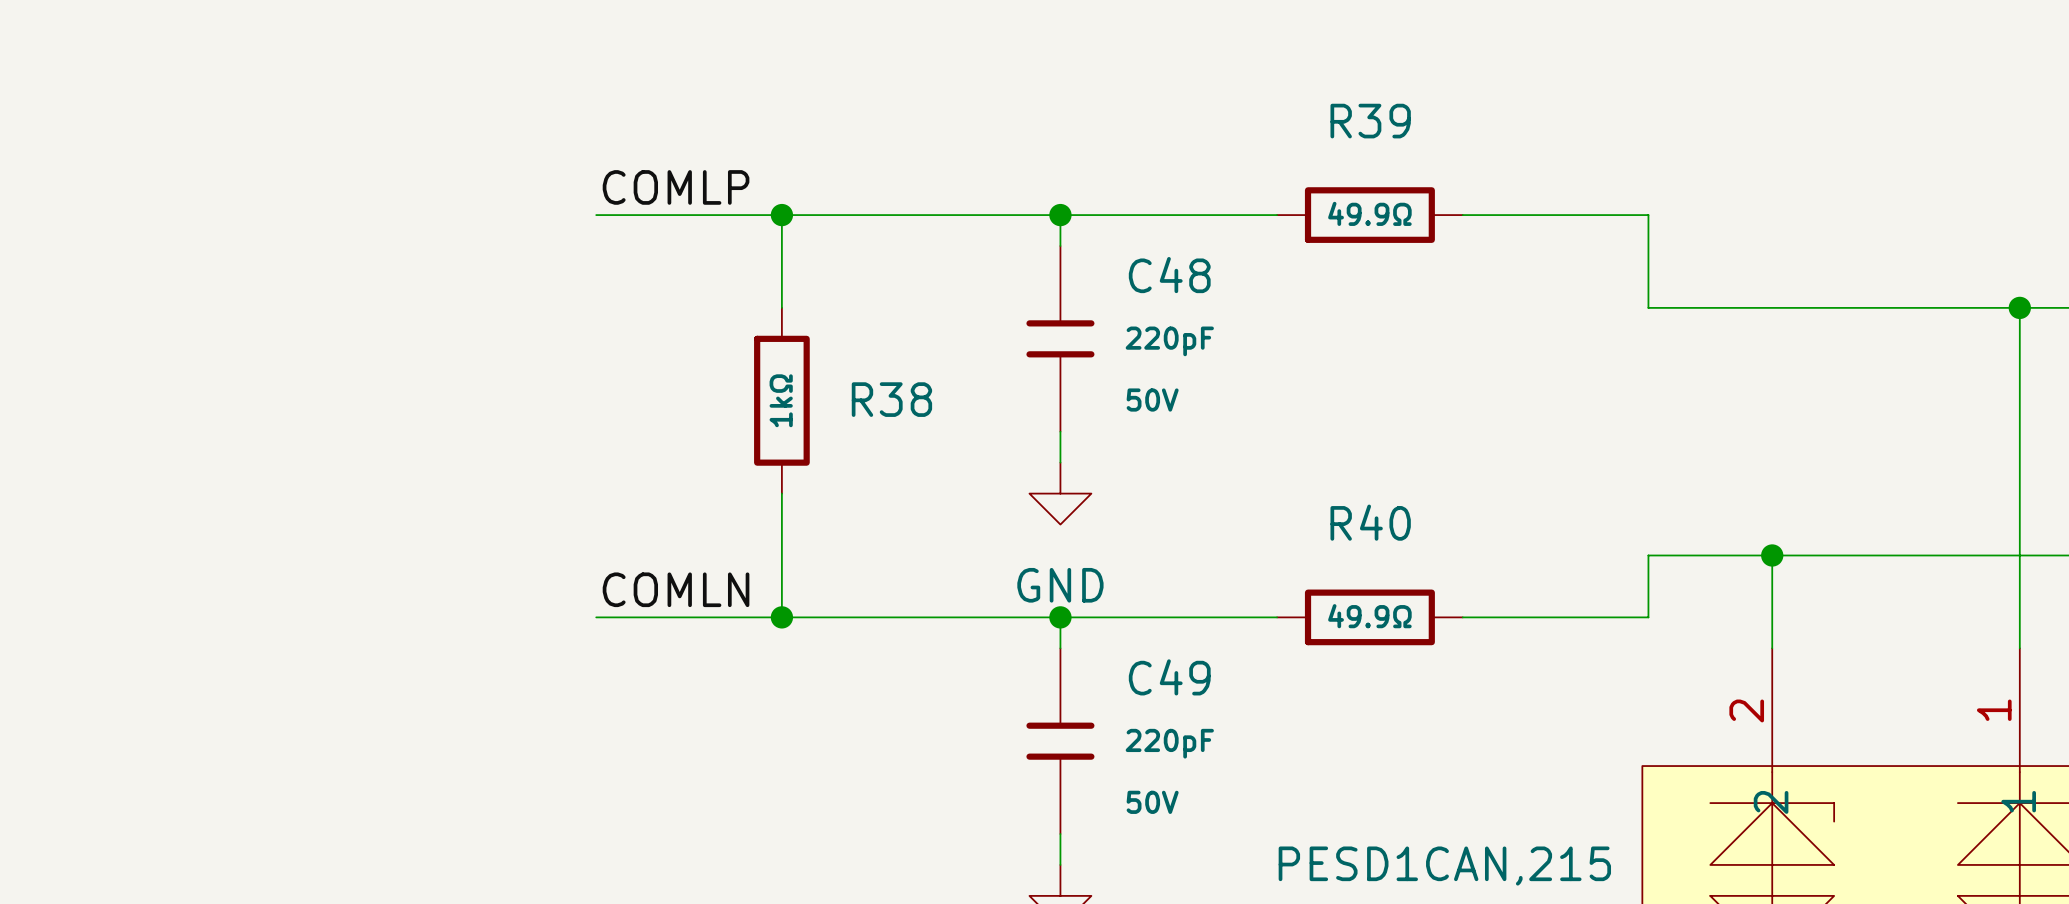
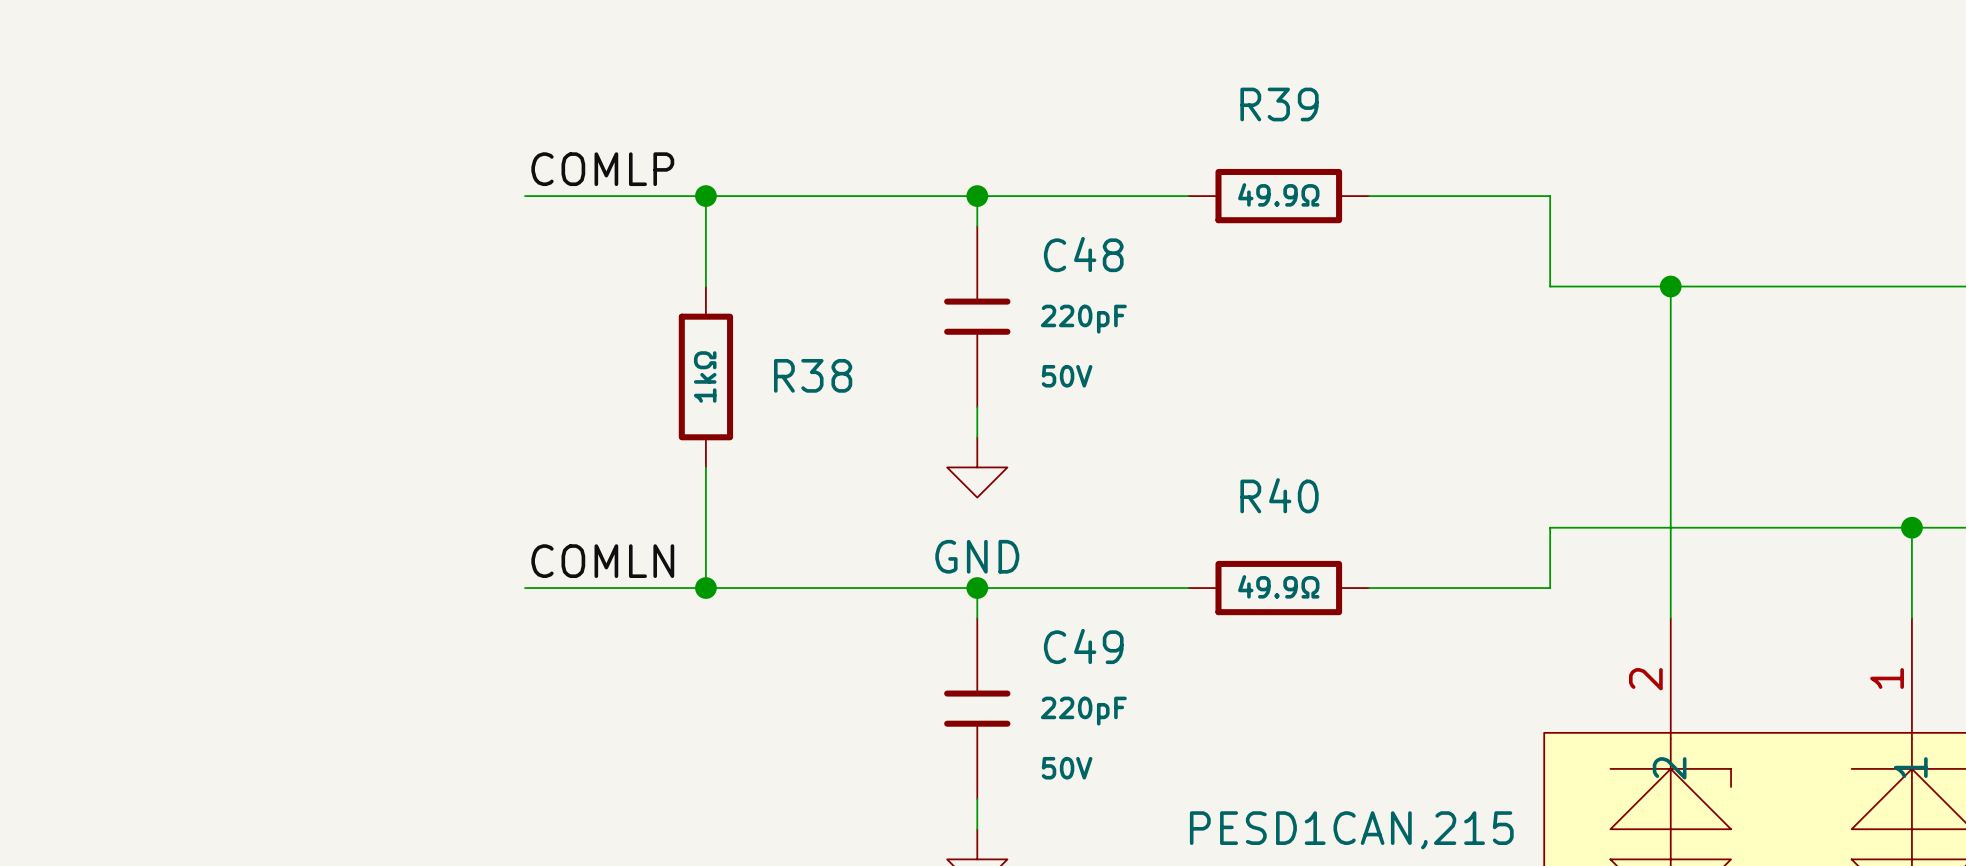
junction: none -> (1670, 286)
wire: (2019, 307) (2019, 555) -> (1670, 286) (1670, 527)
junction: (2019, 307) -> none
junction: (1772, 555) -> none
junction: none -> (1911, 527)

